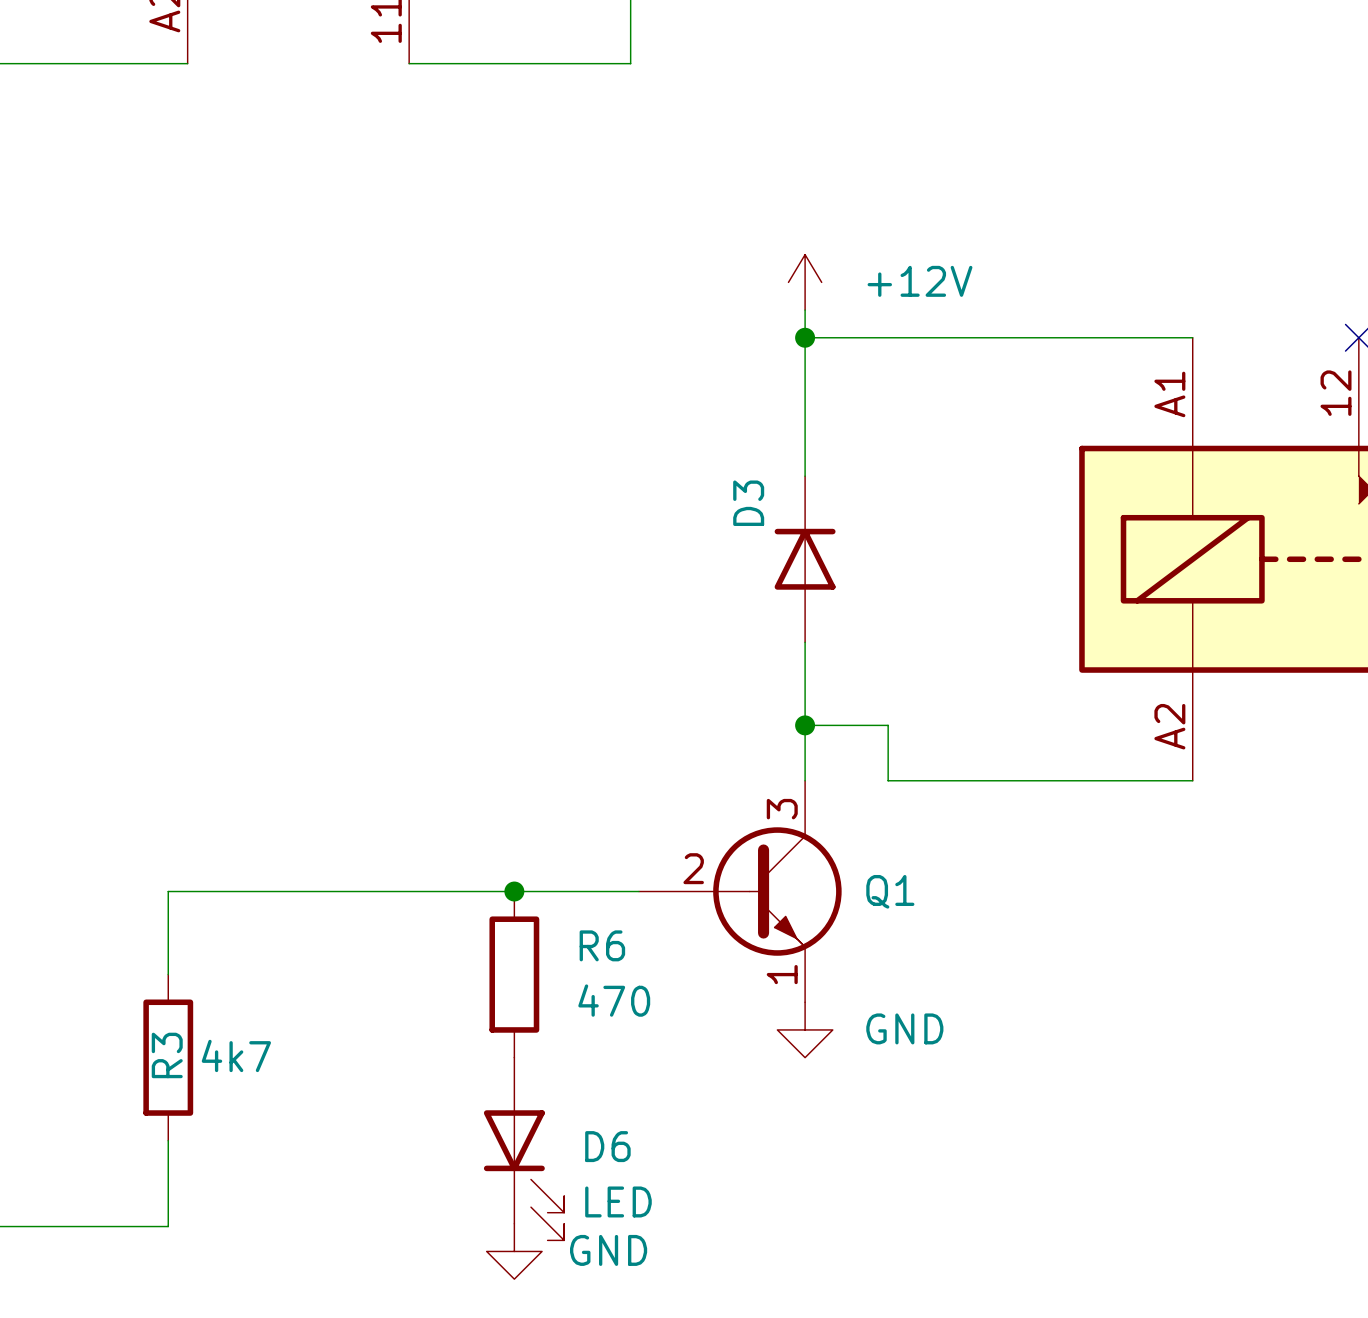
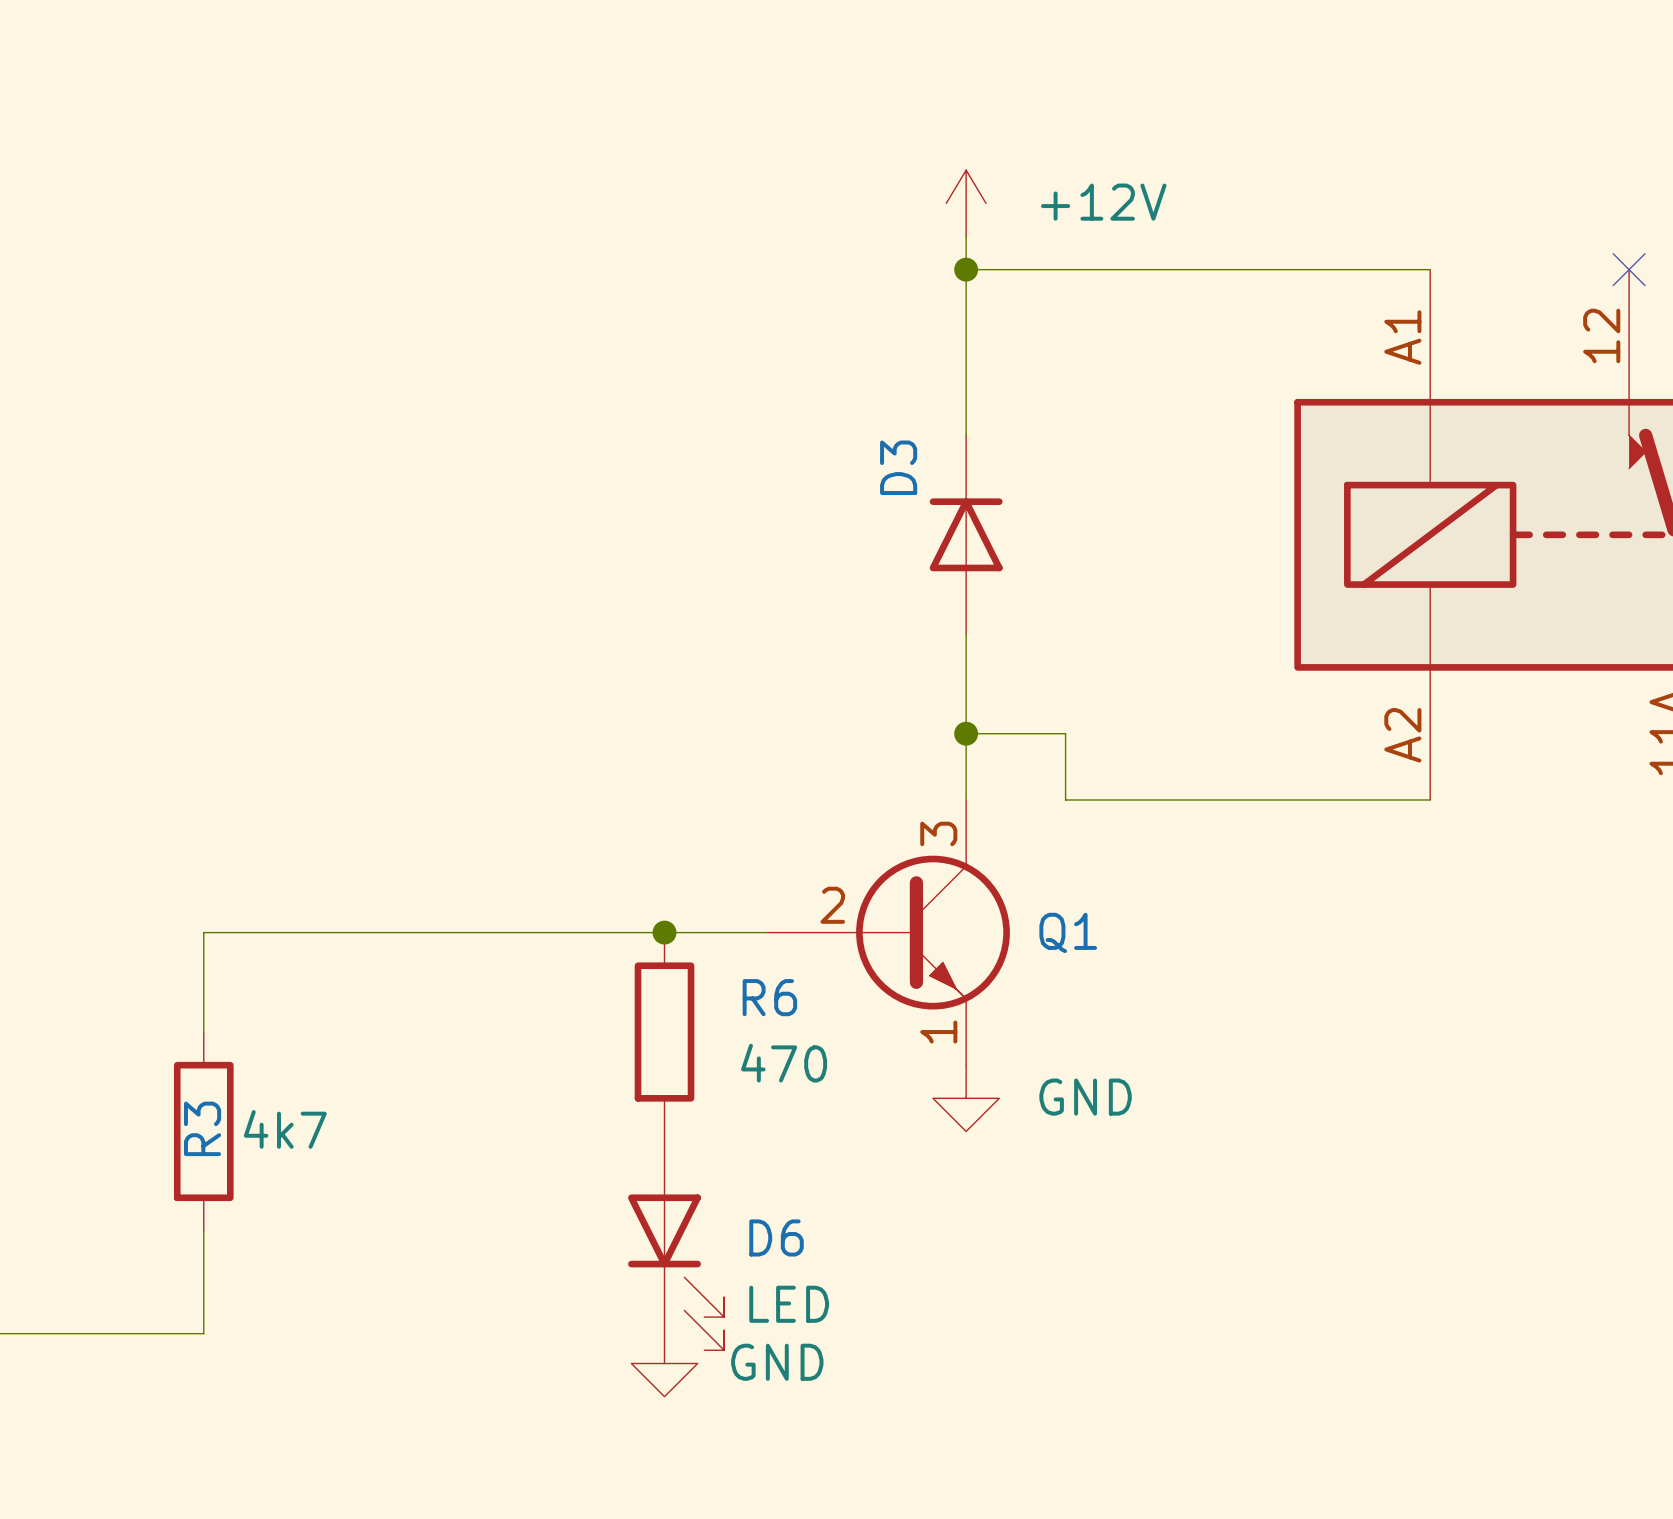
junction position: (514, 891) -> (664, 932)
R6 position: (514, 974) -> (664, 1032)
D6 position: (524, 1149) -> (676, 1240)
power symbol position: GND (514, 1251) -> GND (664, 1363)

